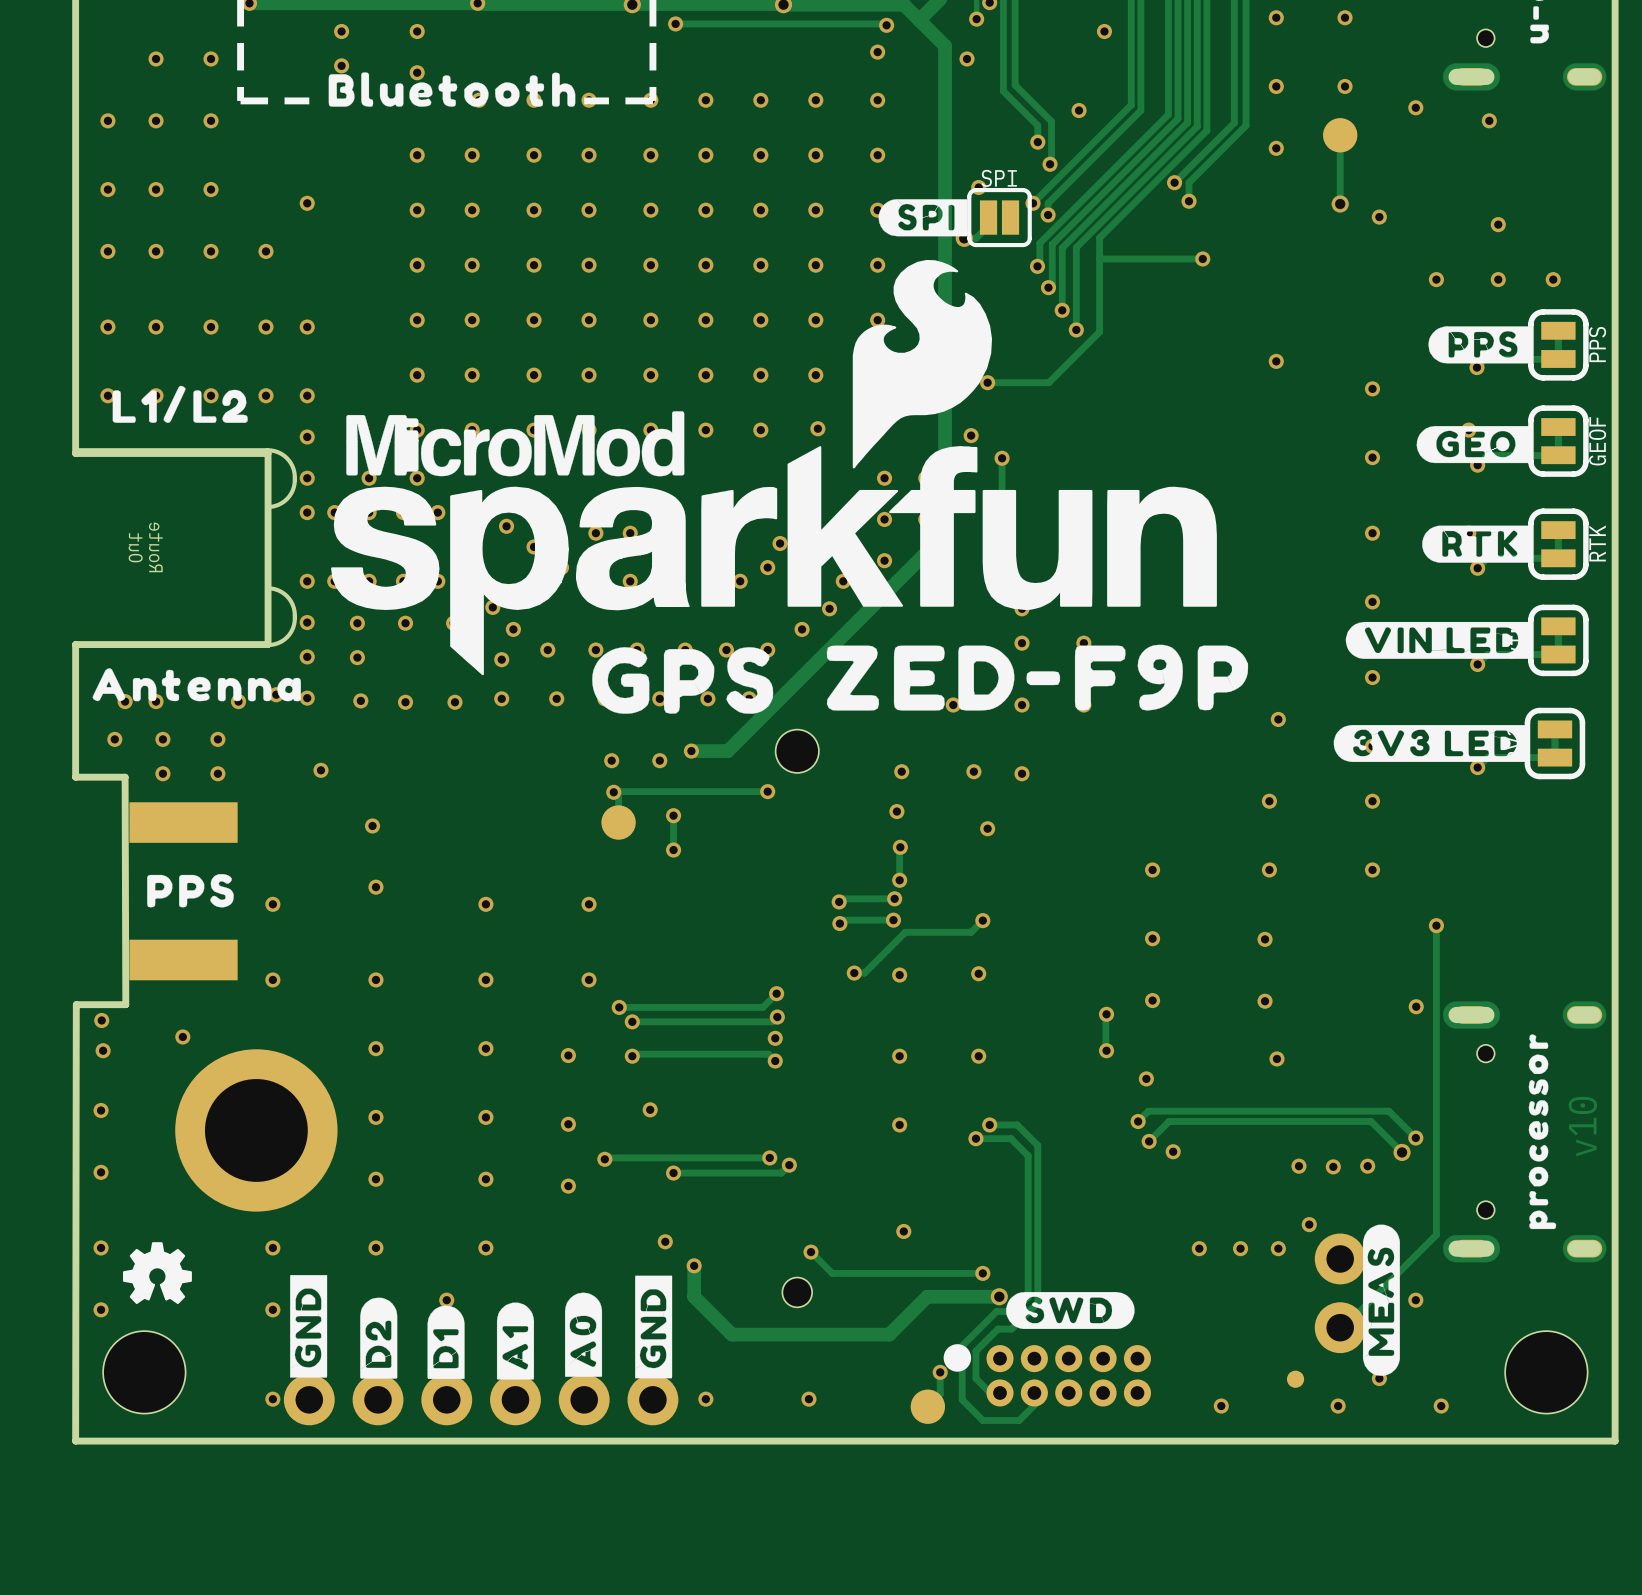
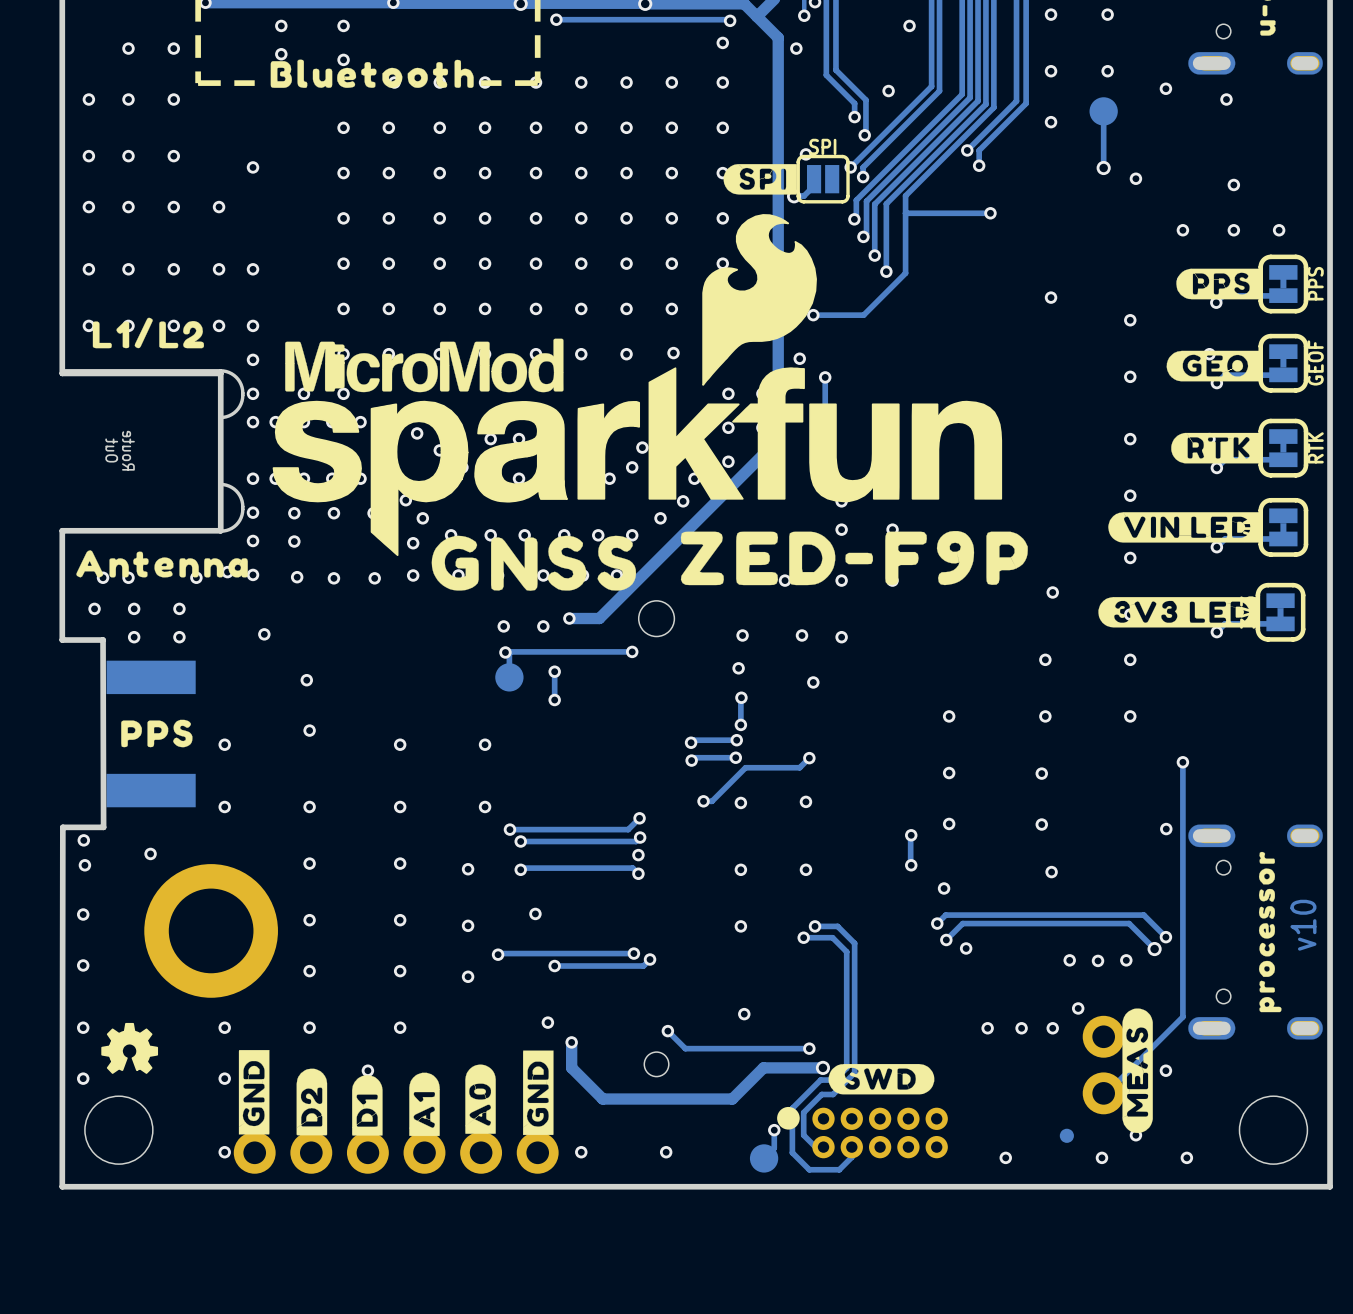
drawing: [592, 647, 774, 714] -> none
drawing: none -> [431, 535, 637, 591]

